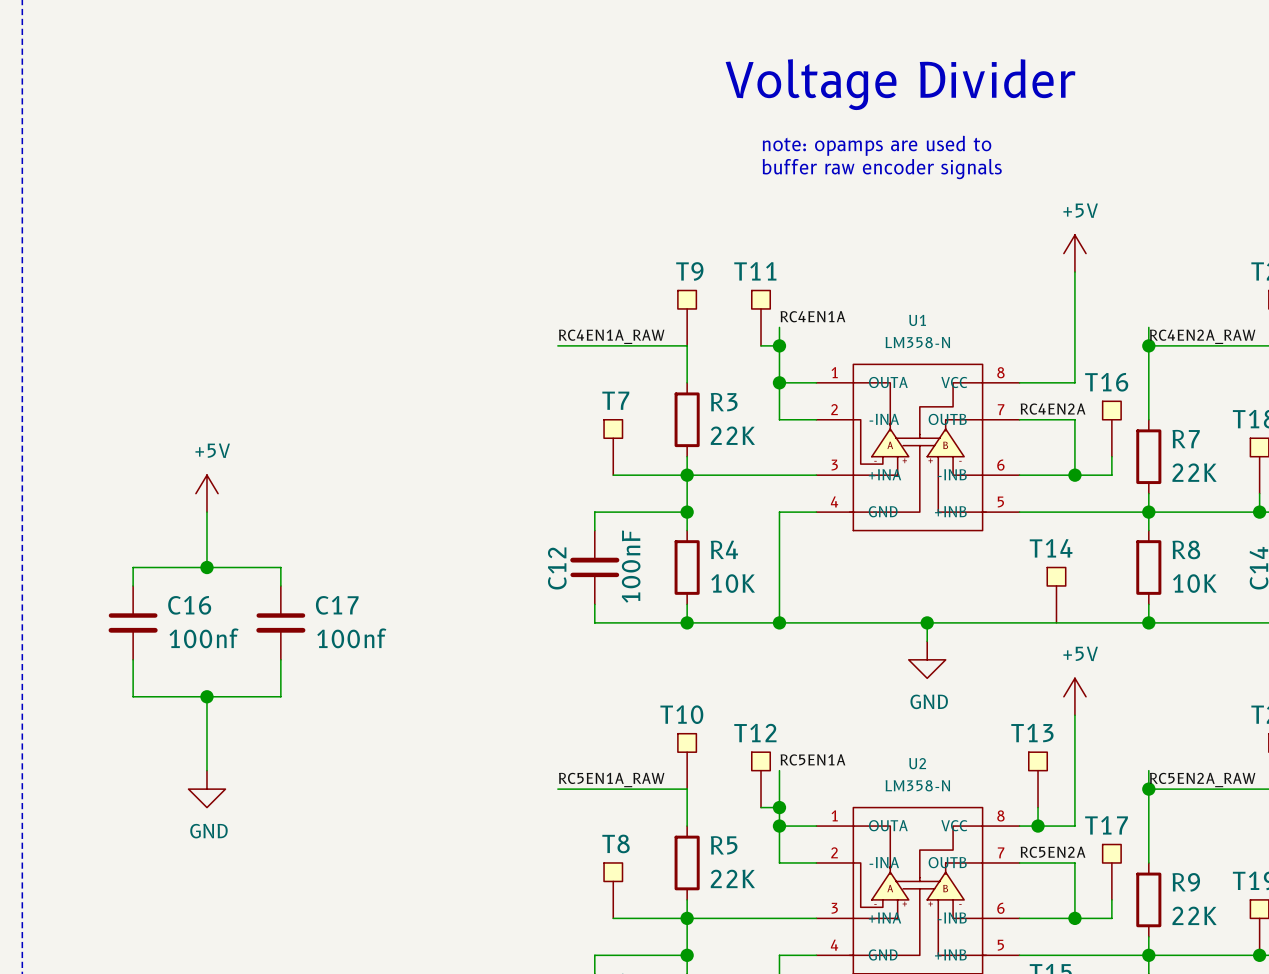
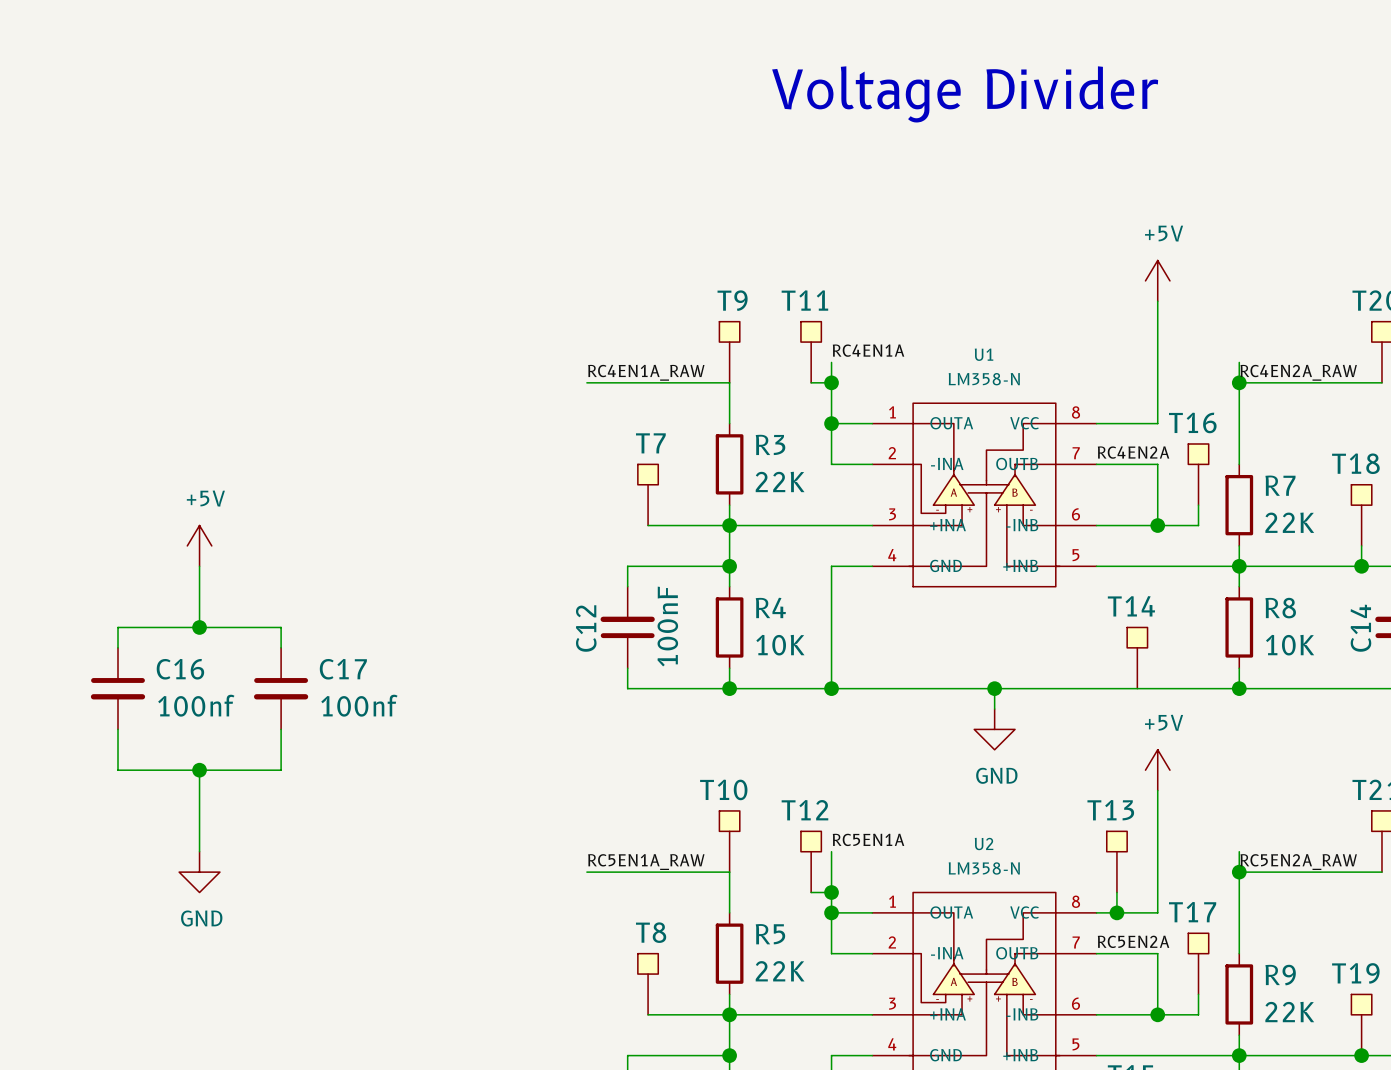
text: note: opamps are used to (877, 145) -> none
text: buffer raw encoder signals (882, 169) -> none

